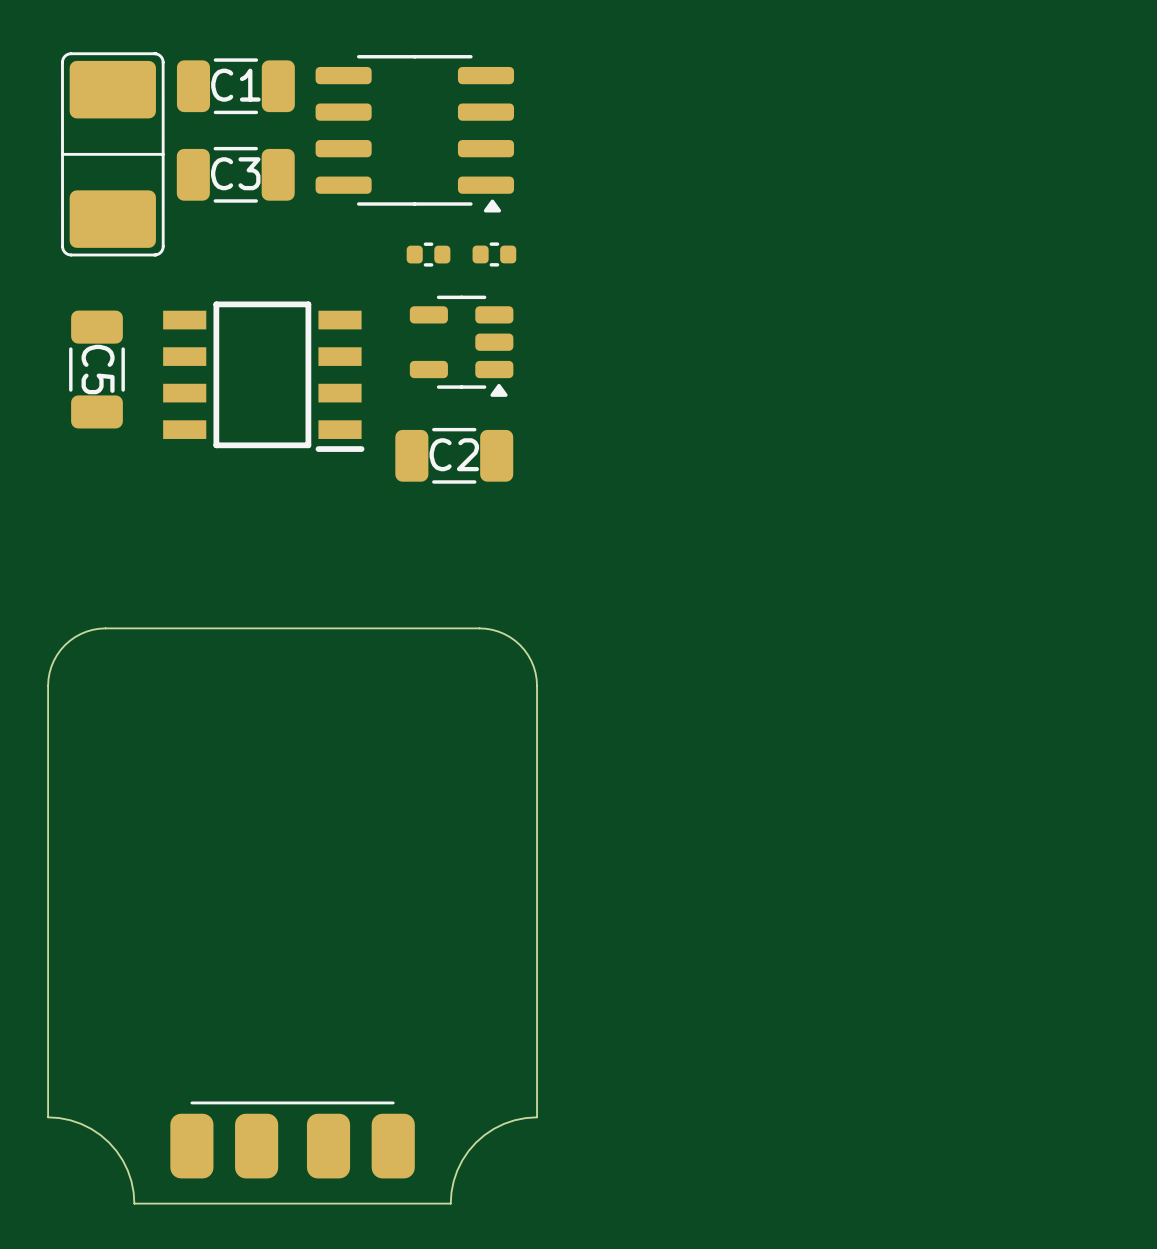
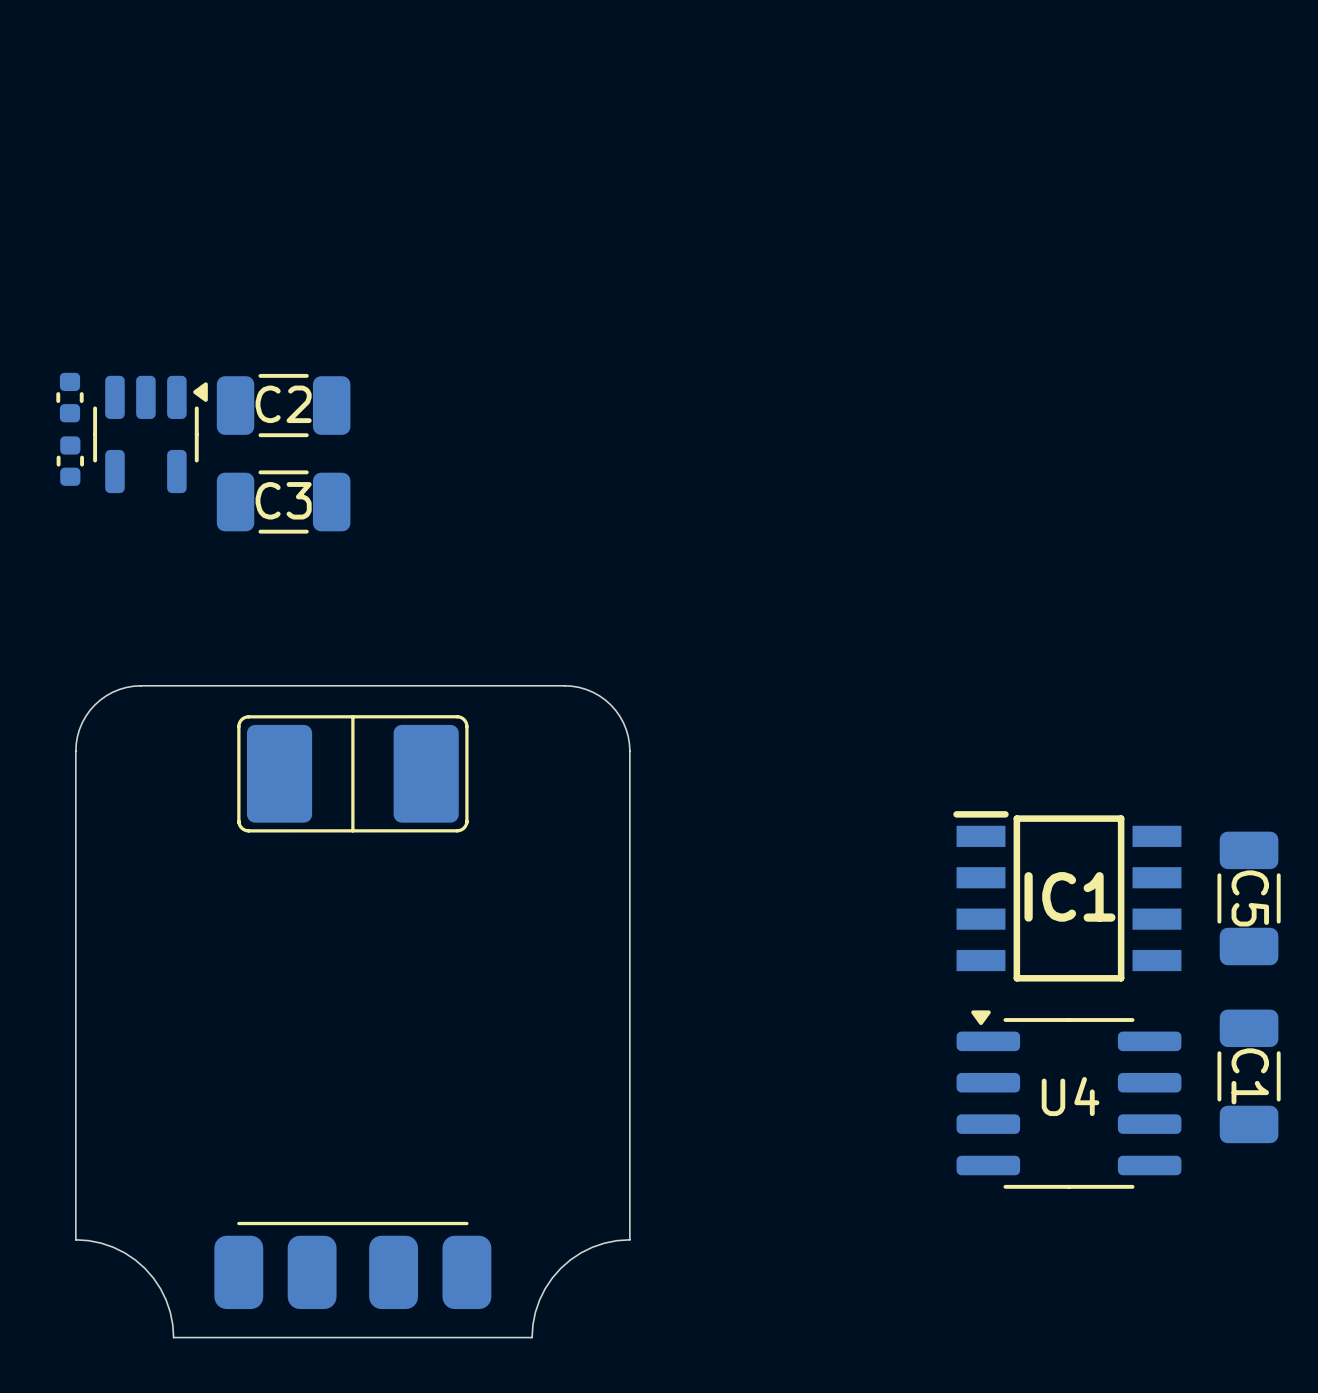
C1 rotation: 0° (235, 86) -> 90° clockwise (1249, 1076)
C1 position: (235, 86) -> (1249, 1076)
part: (414, 133) -> none
part rotation: 0° (112, 154) -> 90° clockwise (352, 773)
part position: (112, 154) -> (352, 773)
C3 position: (235, 174) -> (283, 502)
part: (428, 254) -> none
part: (494, 254) -> none
part rotation: 0° (461, 346) -> 90° counterclockwise (150, 434)
part position: (461, 346) -> (150, 434)
C5 position: (96, 369) -> (1249, 898)
part: none -> (69, 397)
part: (263, 376) -> none
part: none -> (70, 461)
C2 position: (454, 455) -> (283, 405)
IC1: none -> (1067, 896)
U4: none -> (1068, 1099)

